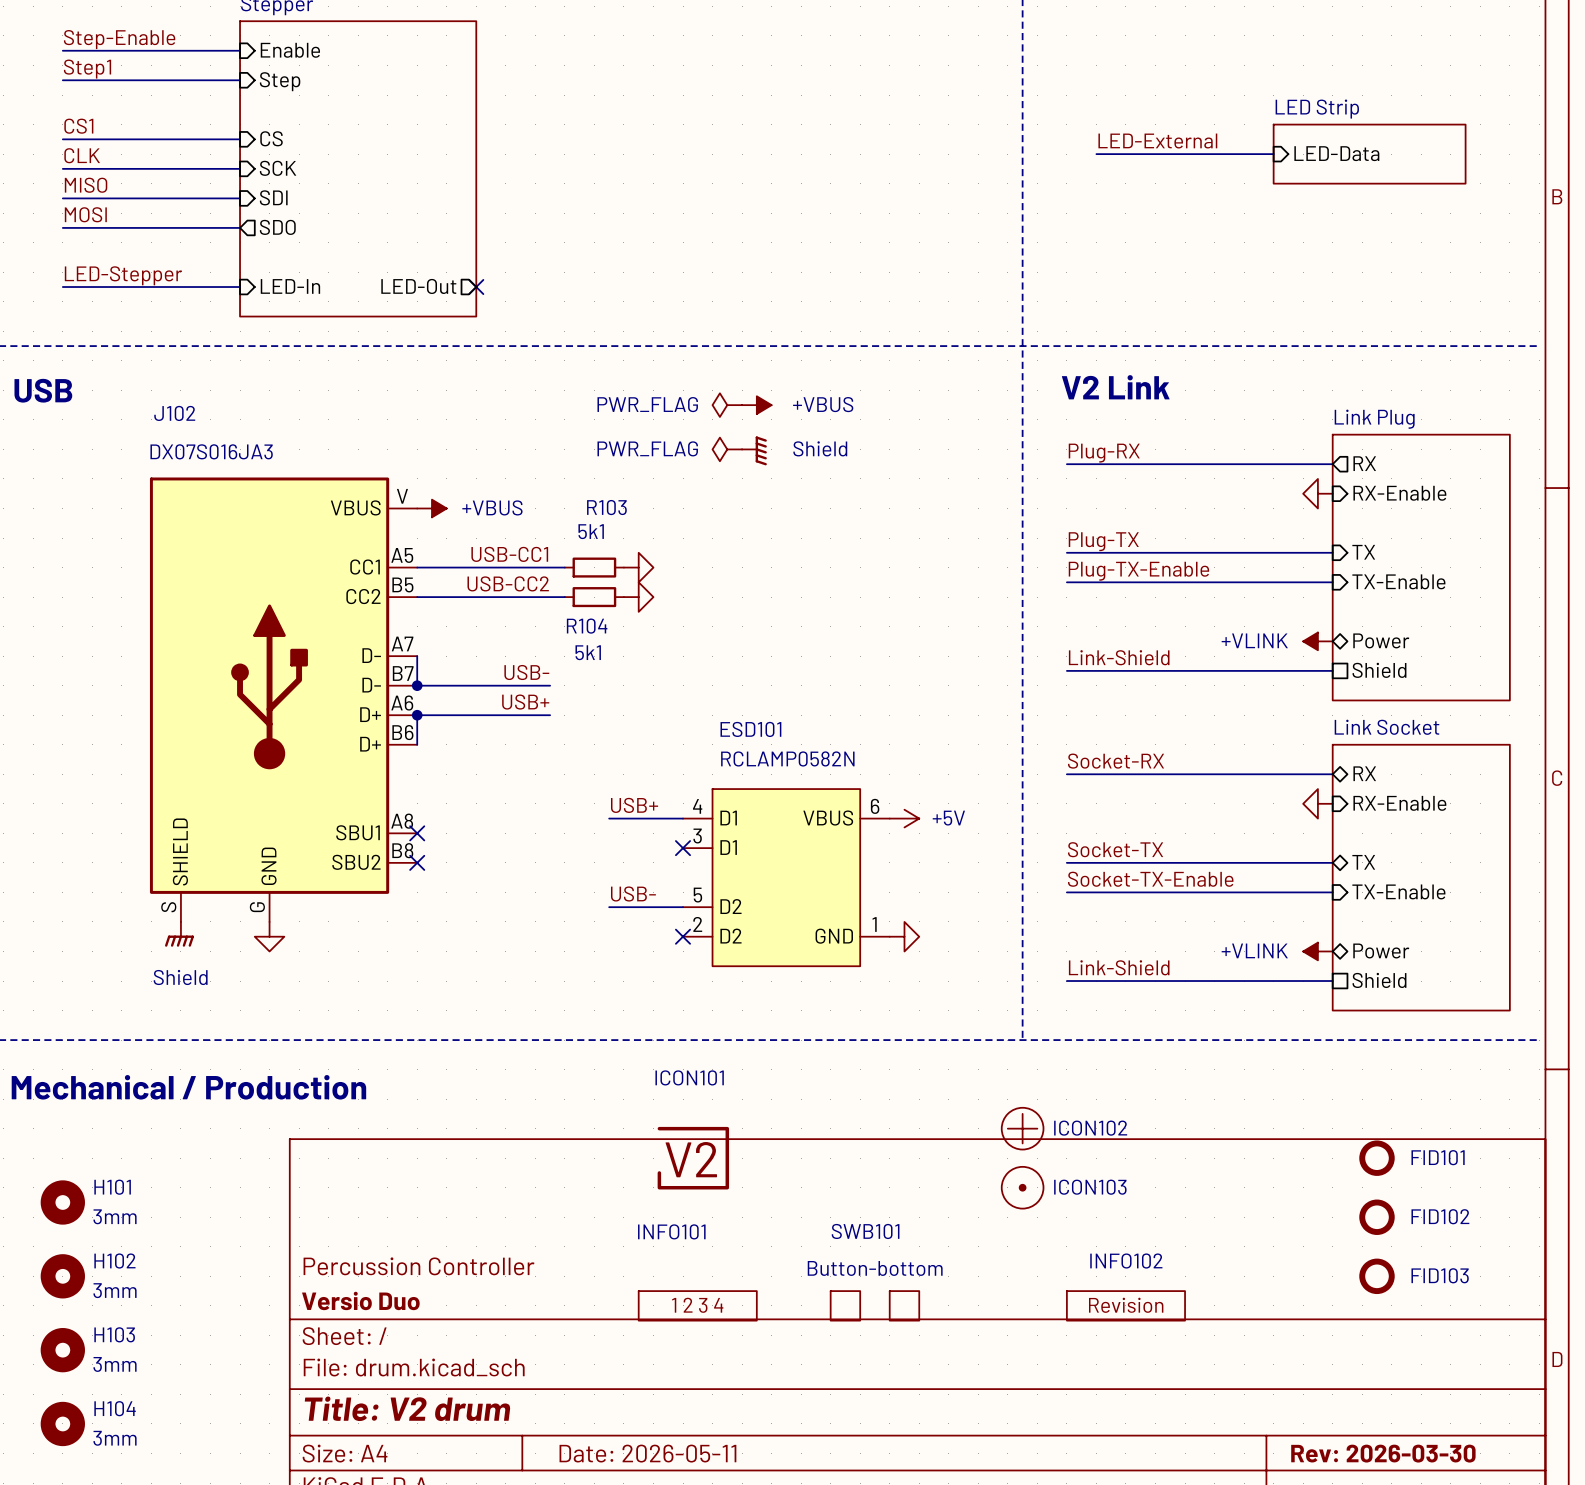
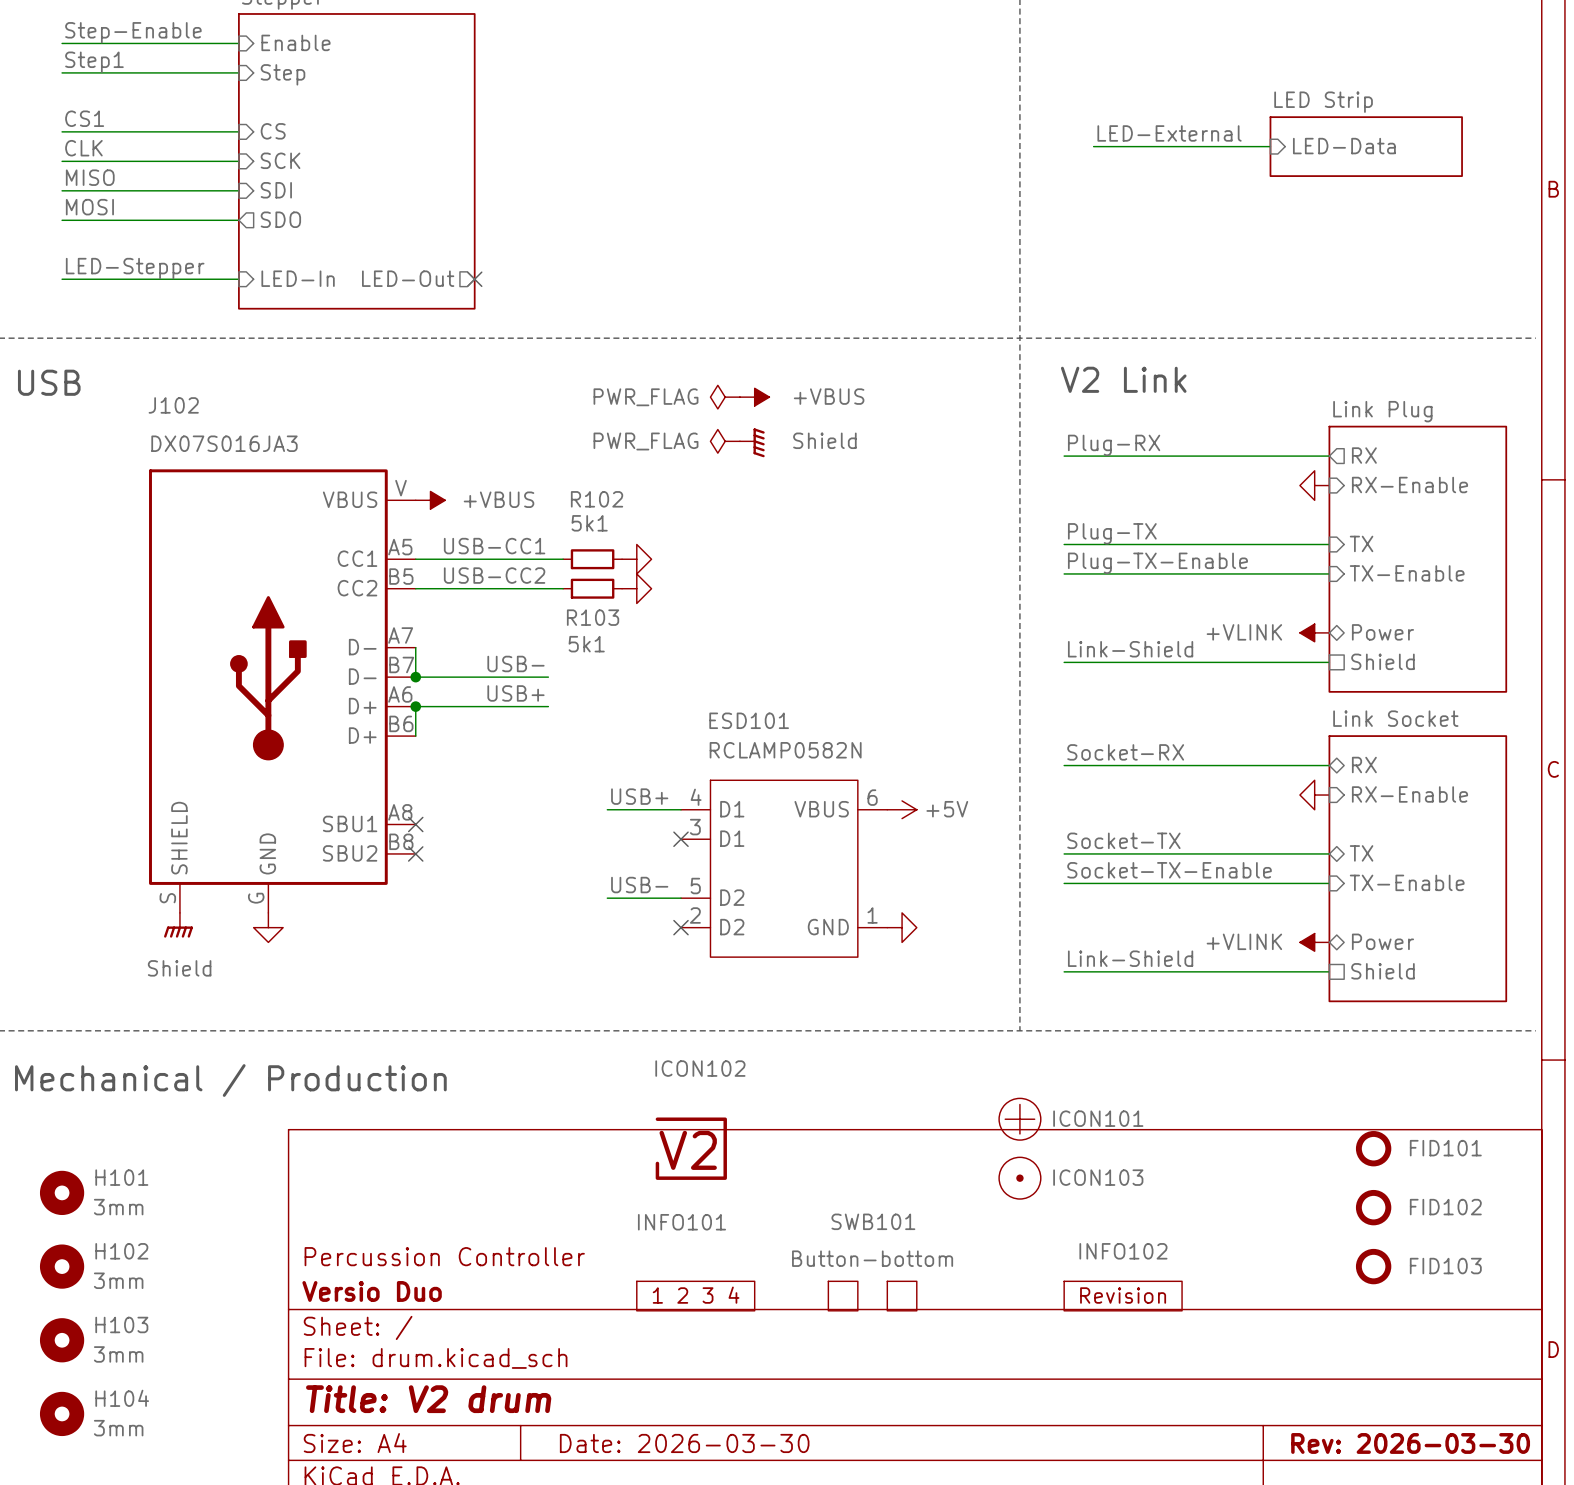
R103 name: R103 (606, 507) -> R102 (597, 499)
R104 name: R104 (587, 626) -> R103 (593, 617)
ICON101 name: ICON101 (689, 1077) -> ICON102 (700, 1068)
ICON102 name: ICON102 (1090, 1128) -> ICON101 (1098, 1118)
title block: Date: 2026-05-11 (647, 1453) -> Date: 2026-03-30 (684, 1443)

